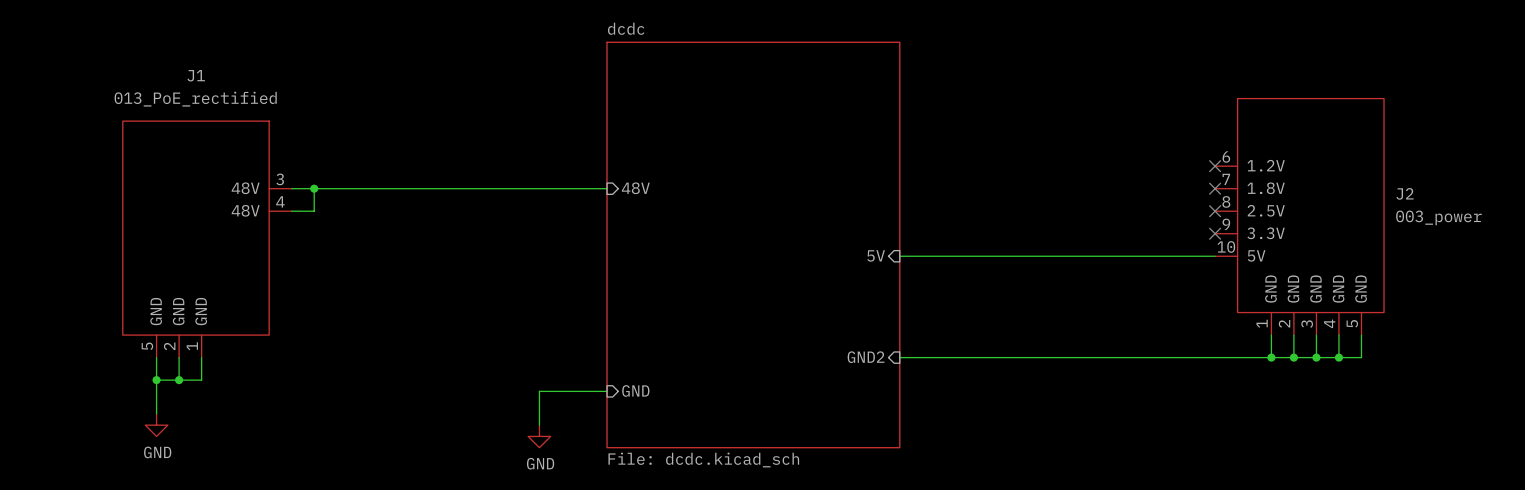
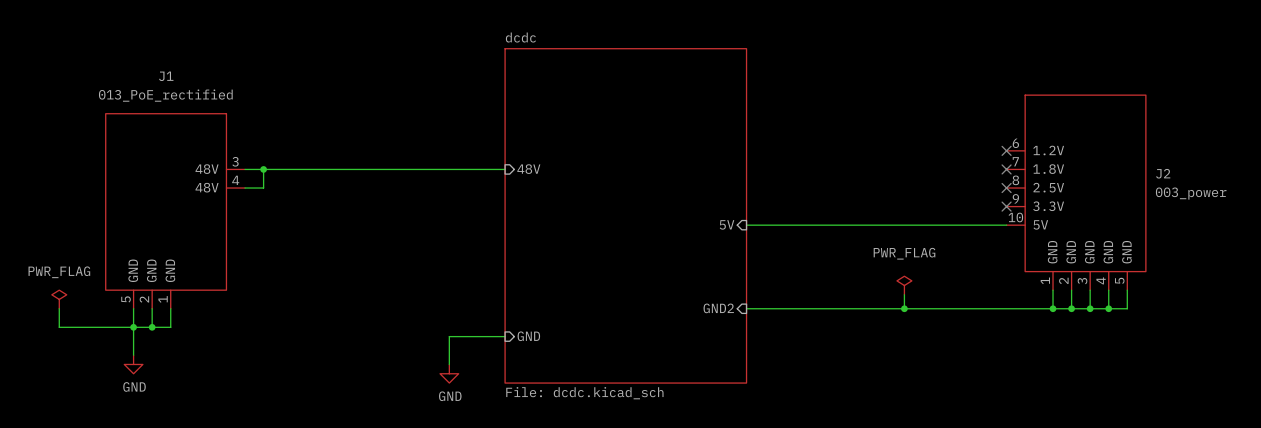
power symbol: none -> PWR_FLAG (904, 285)
wire: none -> (904, 294) (904, 308)
power symbol: none -> PWR_FLAG (59, 299)
wire: none -> (59, 308) (59, 327) (133, 327)
junction: none -> (904, 308)

